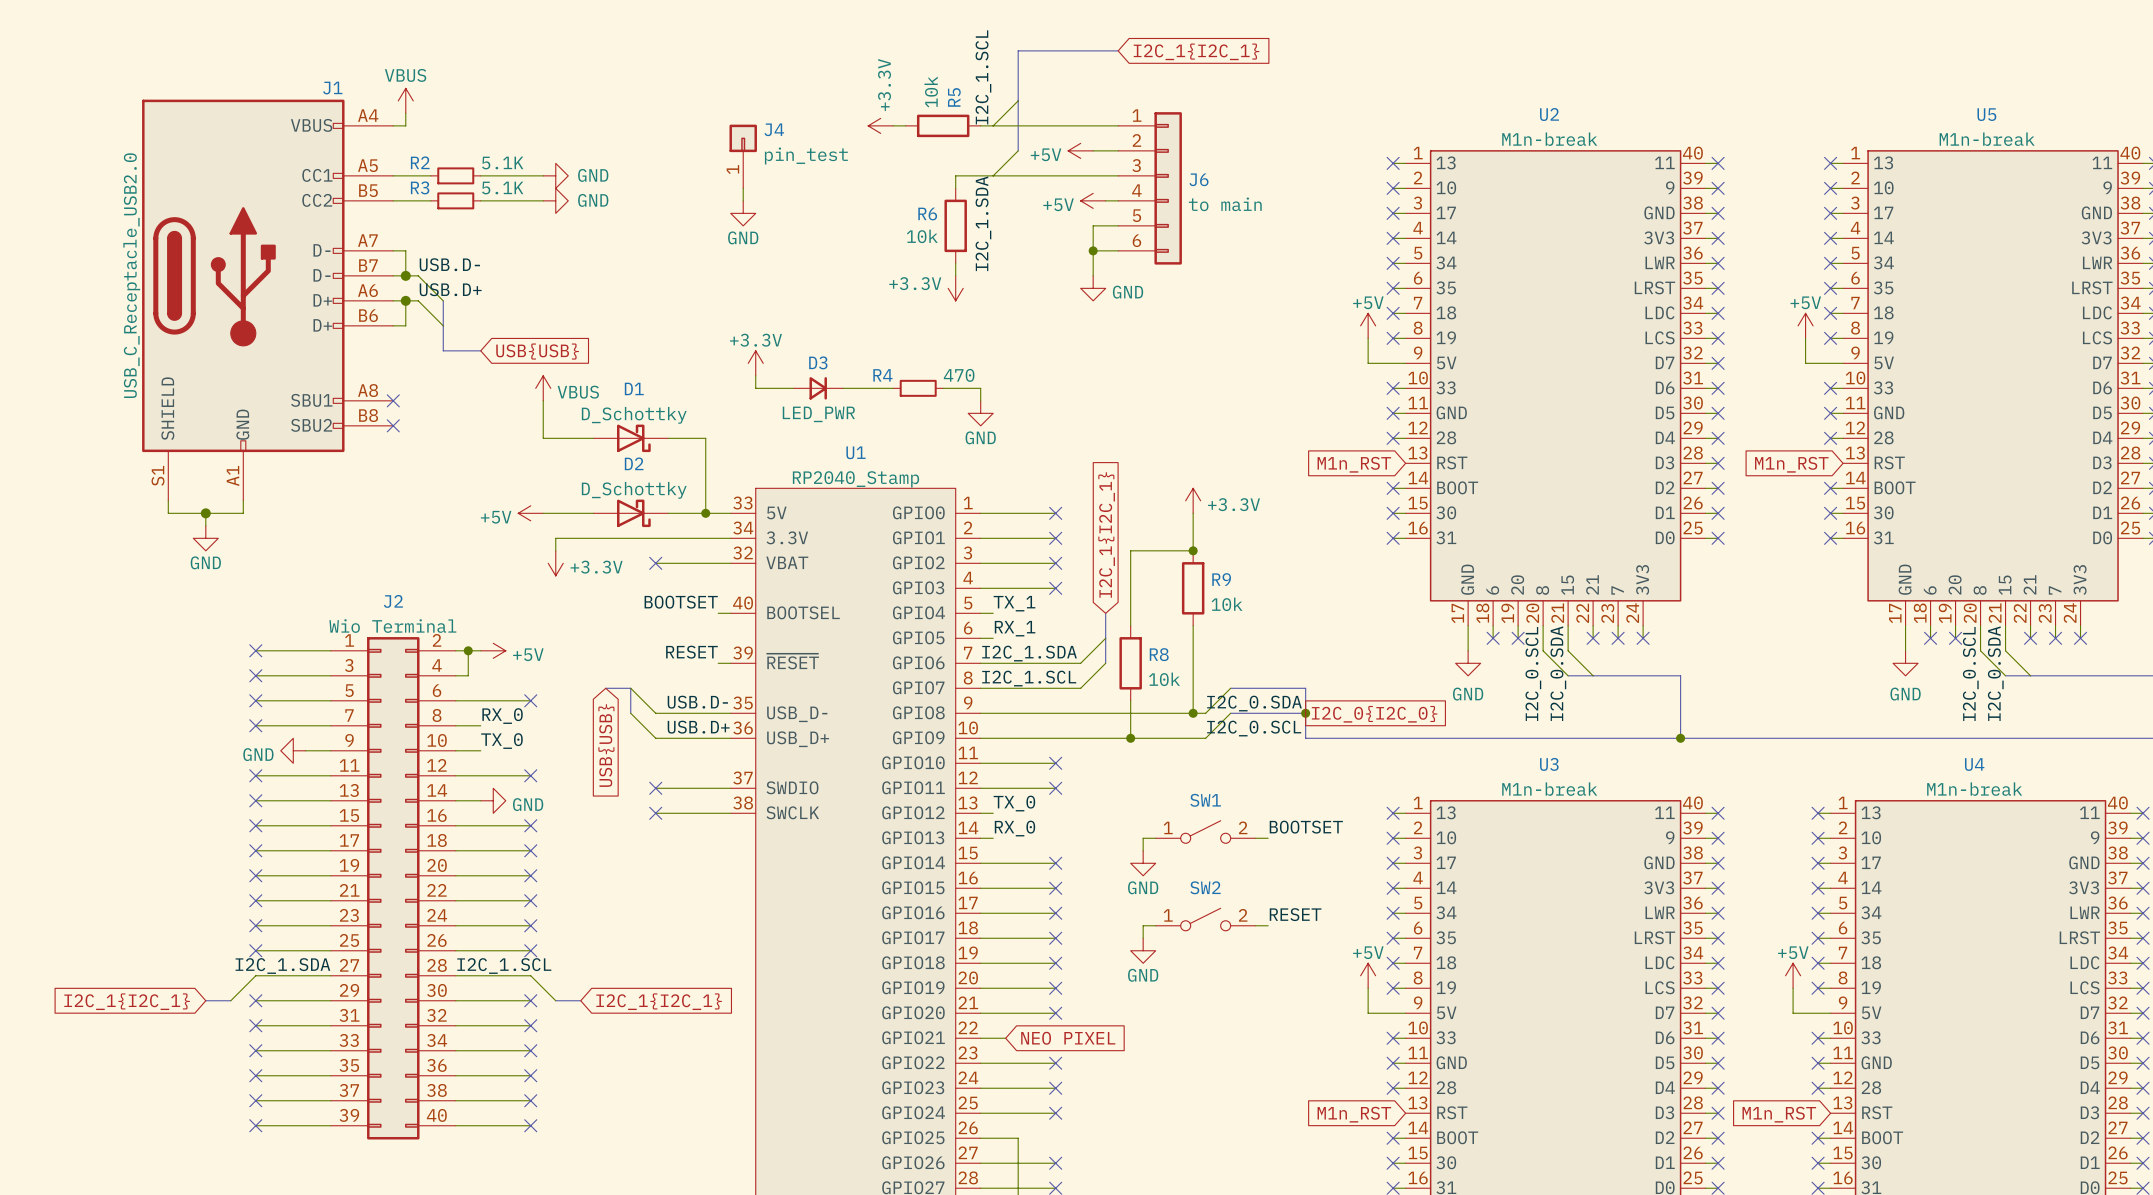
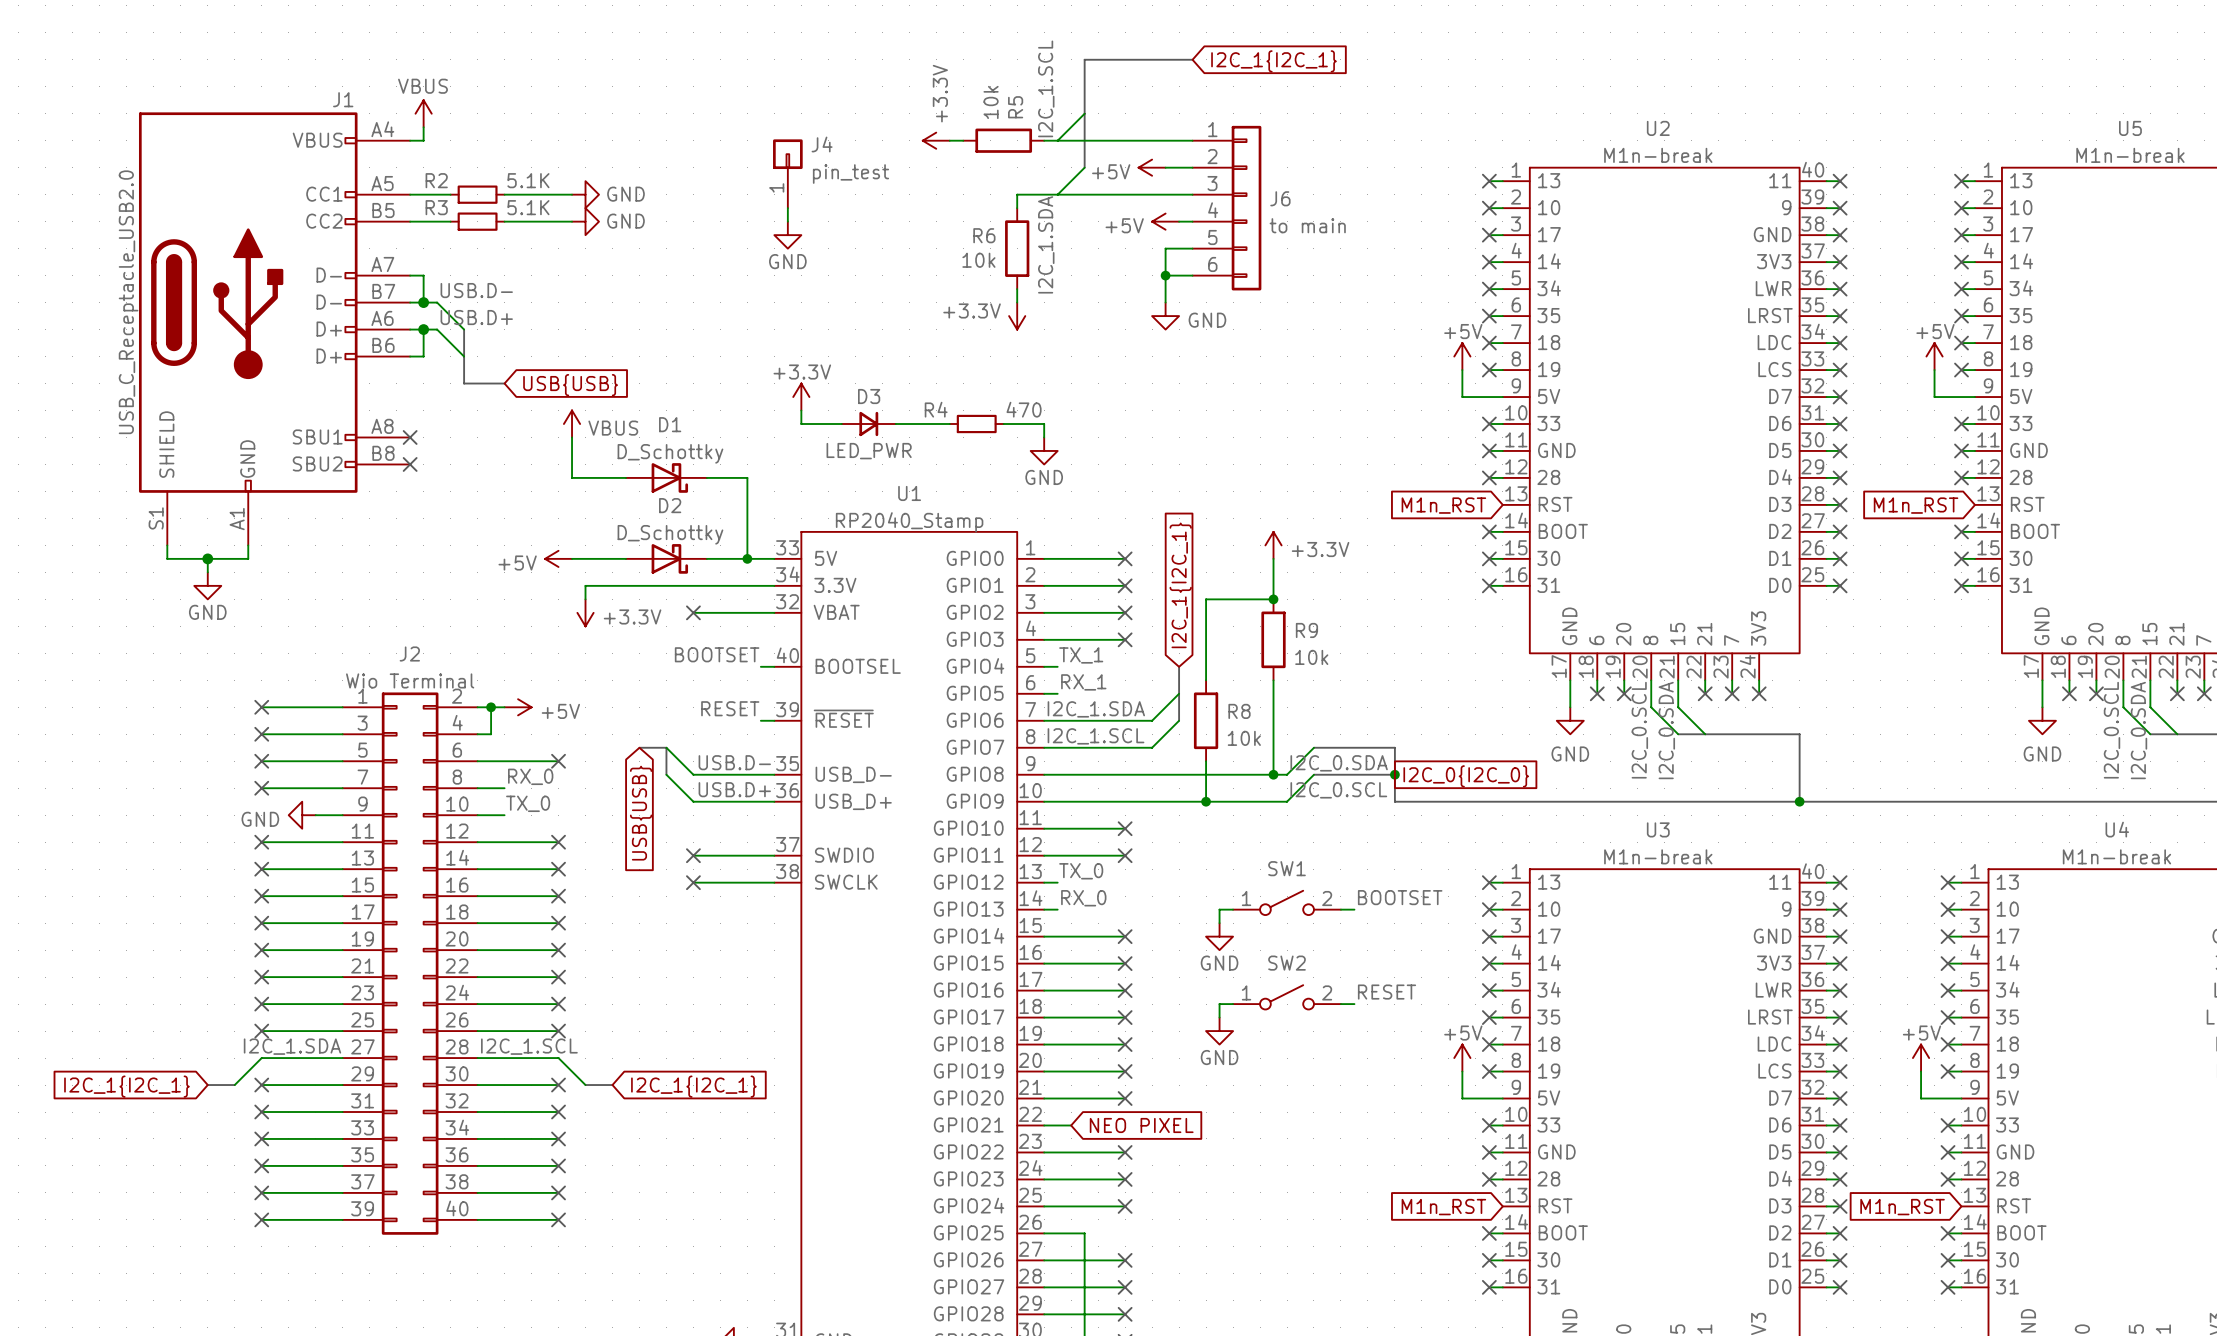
wire: none -> (504, 869) (558, 869)
power symbol: GND (493, 800) -> none
no-connect mark: none -> (558, 869)

